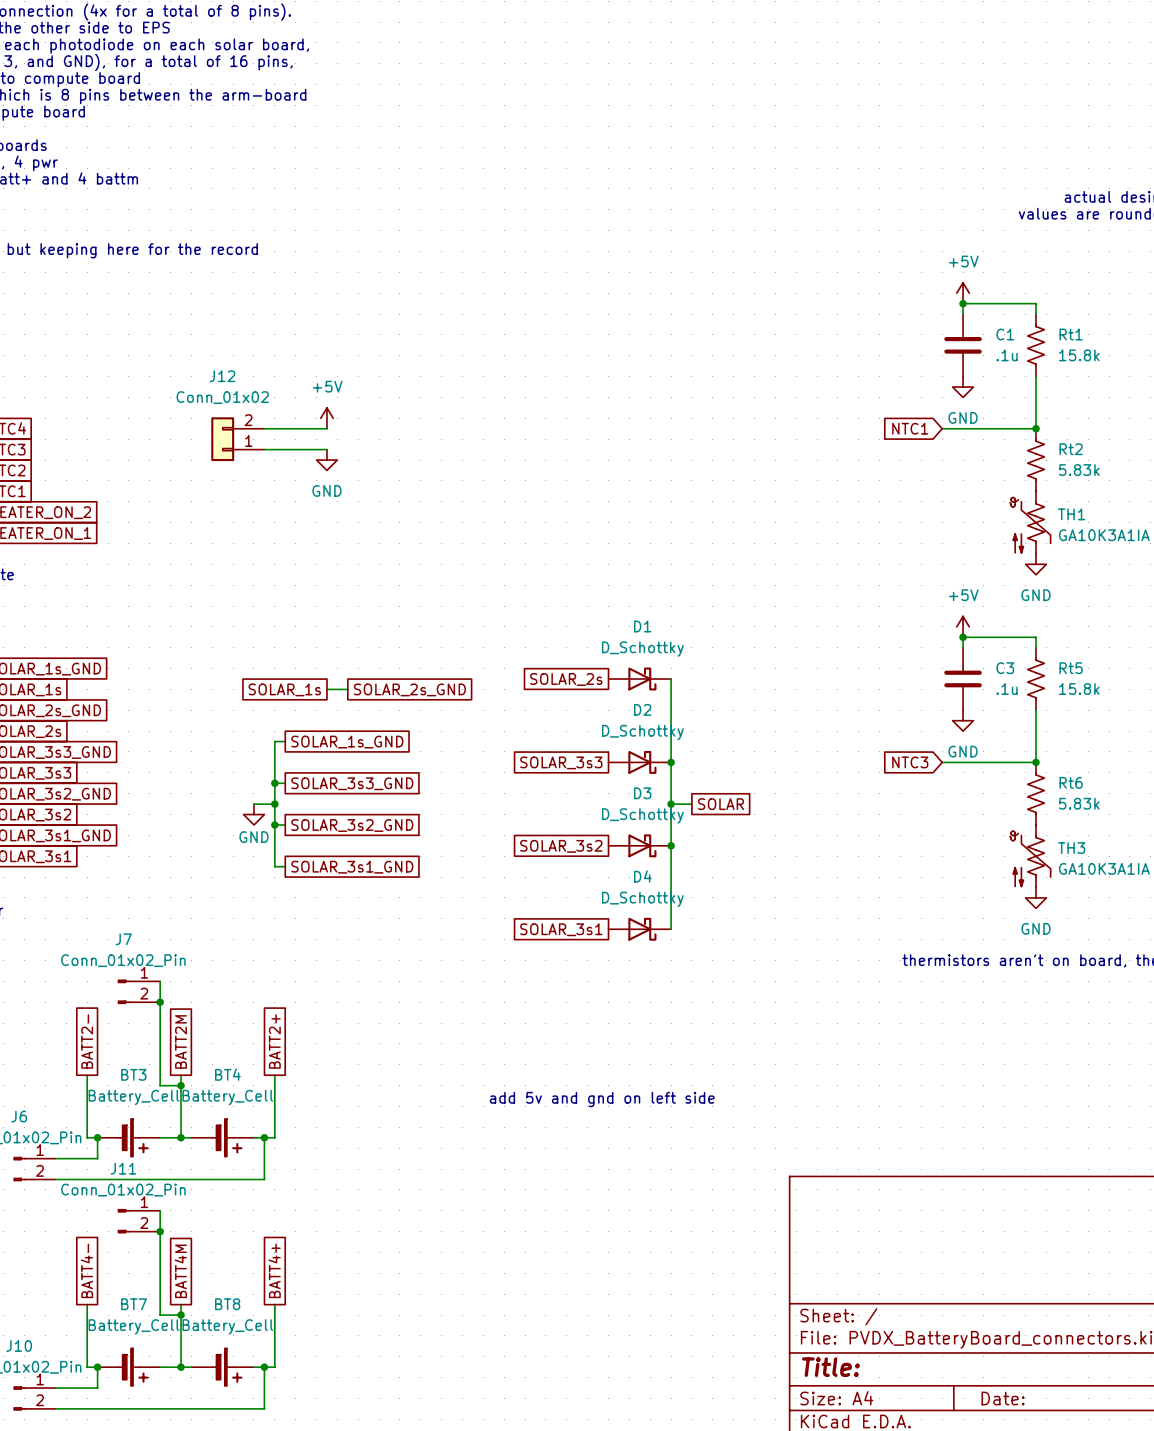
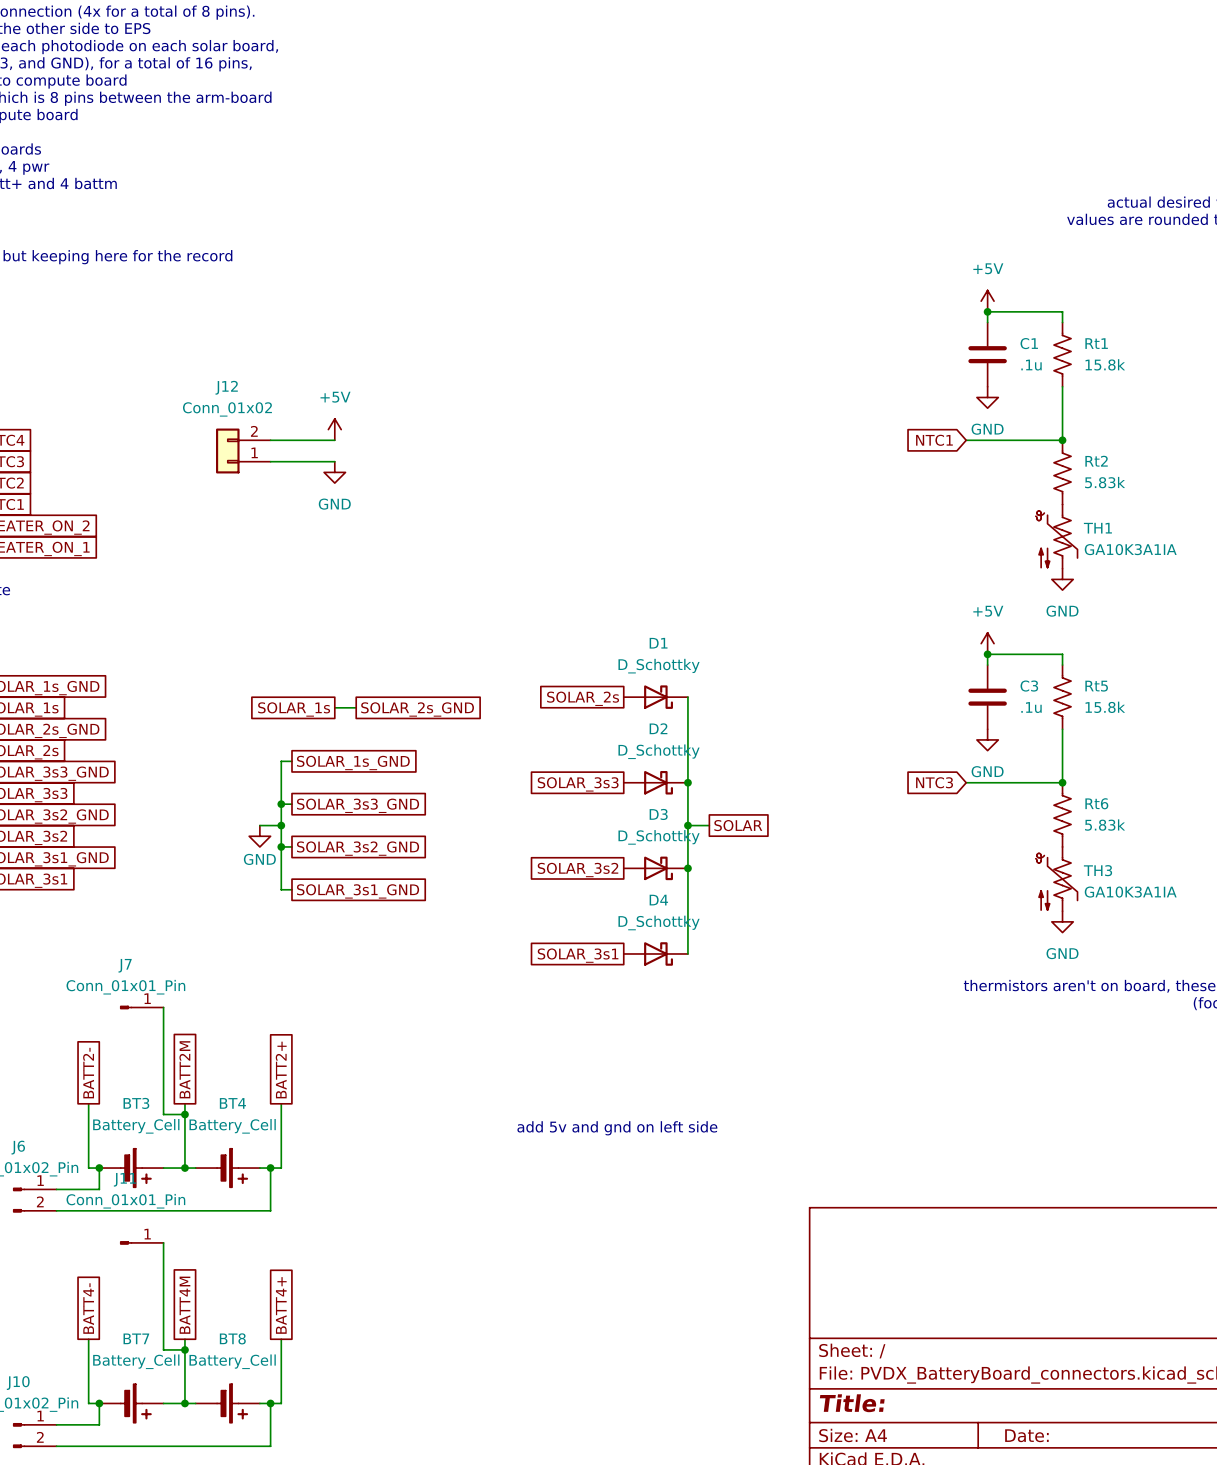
J7 value: Conn_01x02_Pin (123, 960) -> Conn_01x01_Pin (125, 987)
J7 symbol: [117, 979, 161, 1004] -> [120, 1005, 164, 1010]
junction: (160, 1002) -> none
J11 value: Conn_01x02_Pin (123, 1190) -> Conn_01x01_Pin (125, 1201)
J11 symbol: [117, 1209, 161, 1234] -> [120, 1241, 164, 1245]
junction: (160, 1231) -> none

